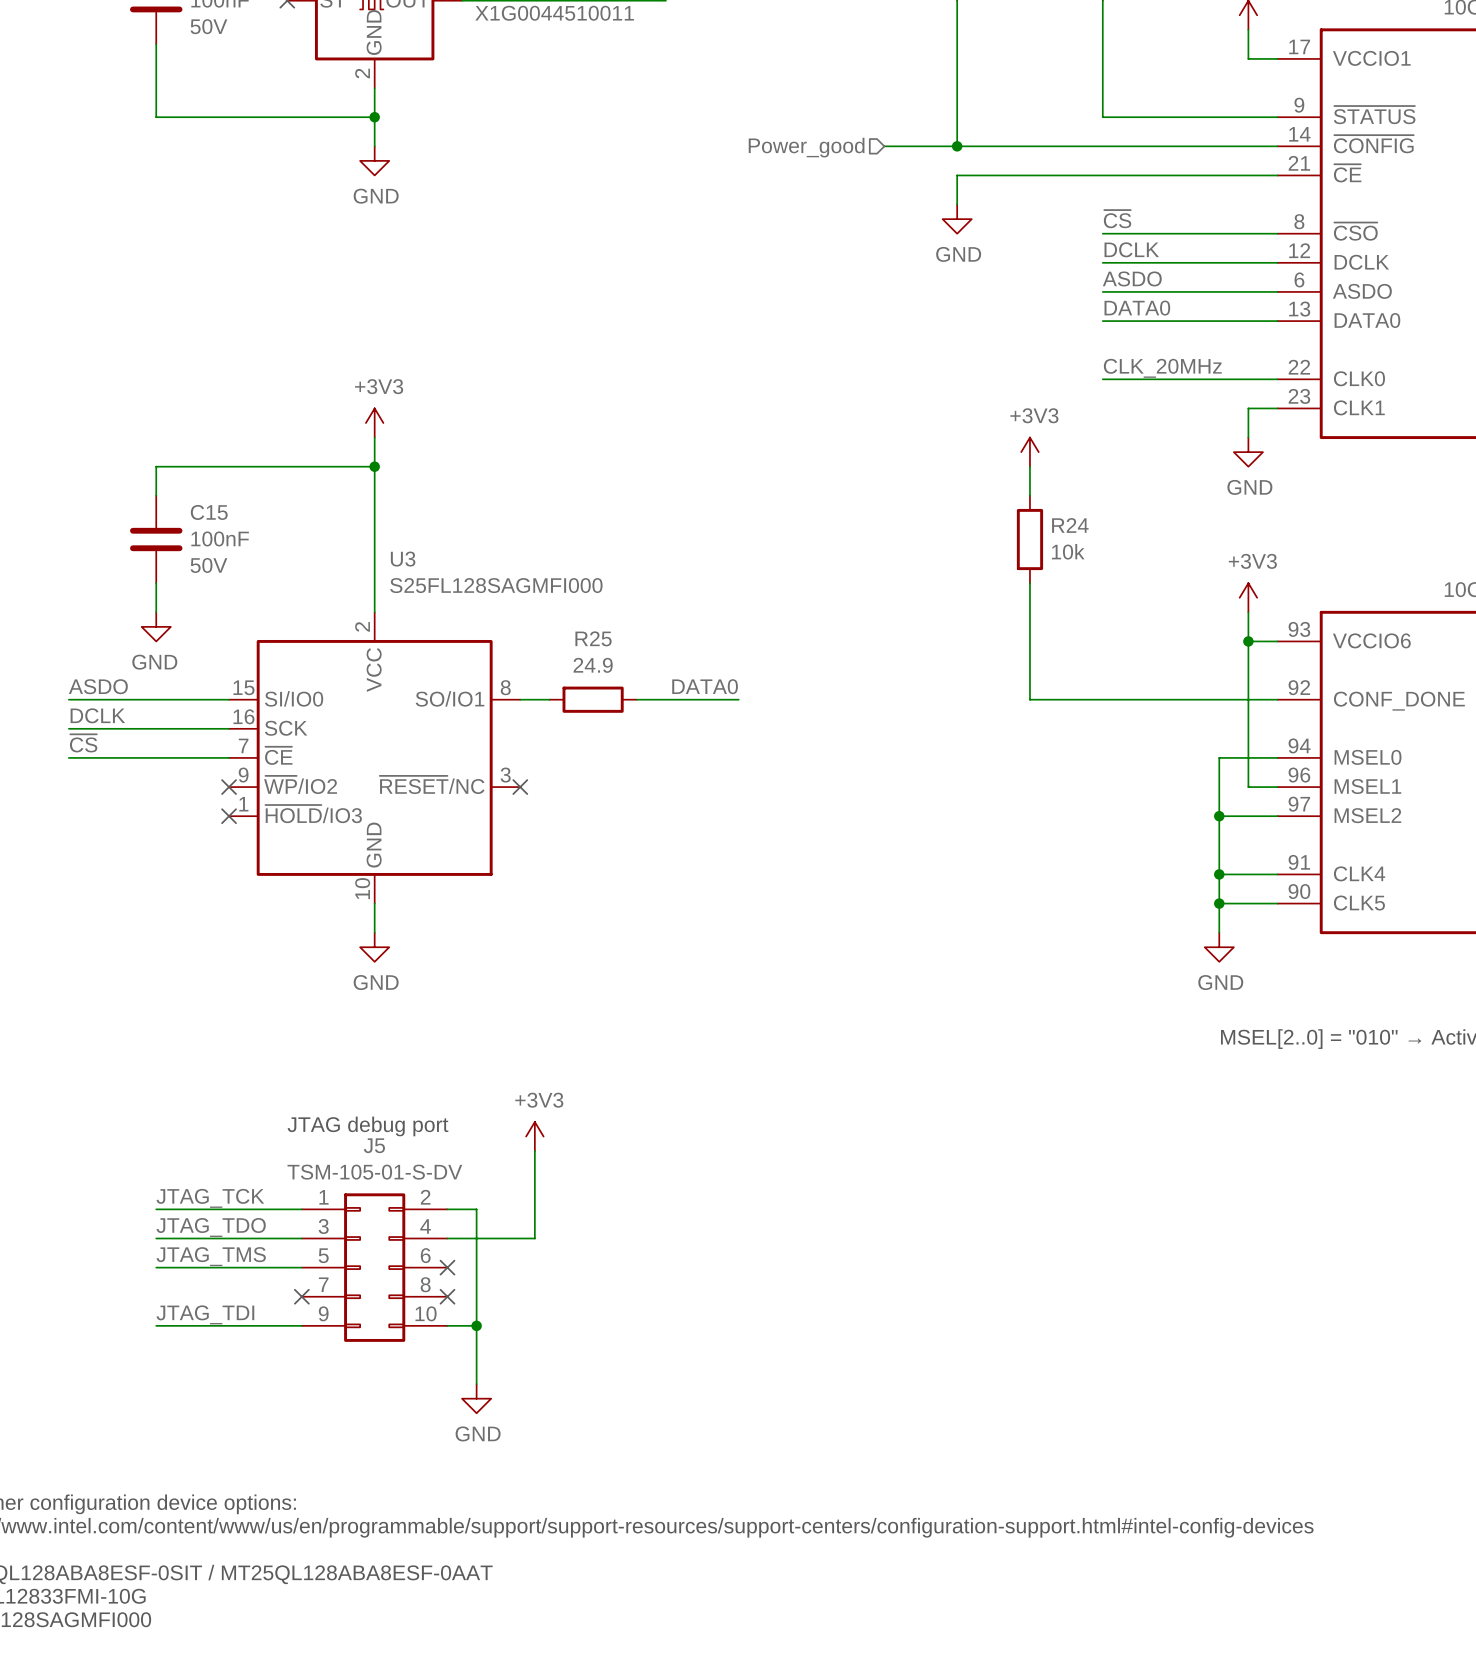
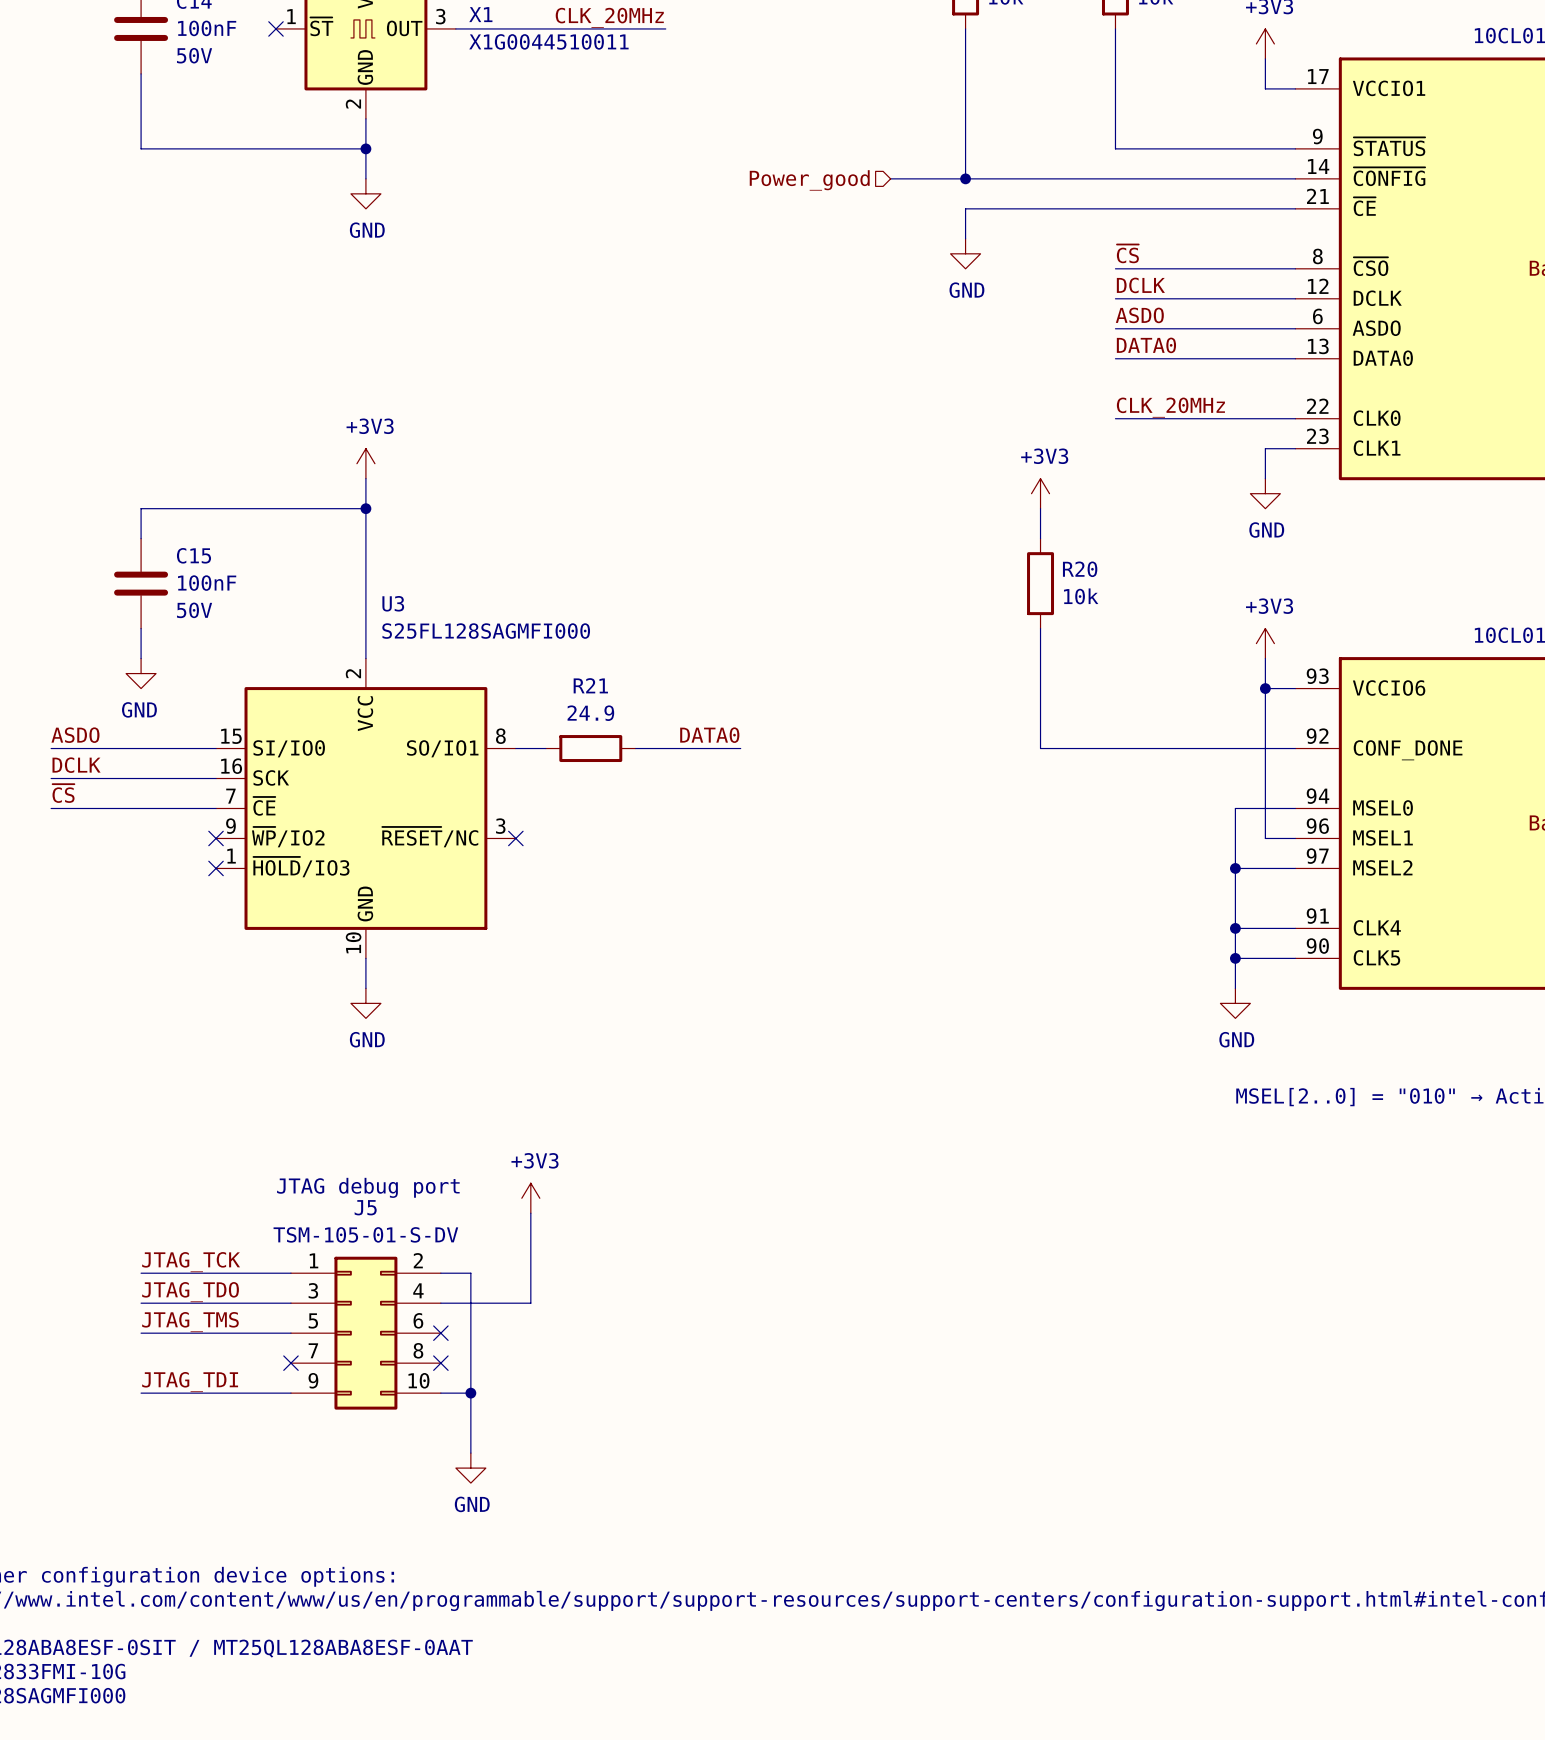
R24 name: R24 (1070, 525) -> R20 (1080, 569)
R25 name: R25 (593, 638) -> R21 (590, 685)

